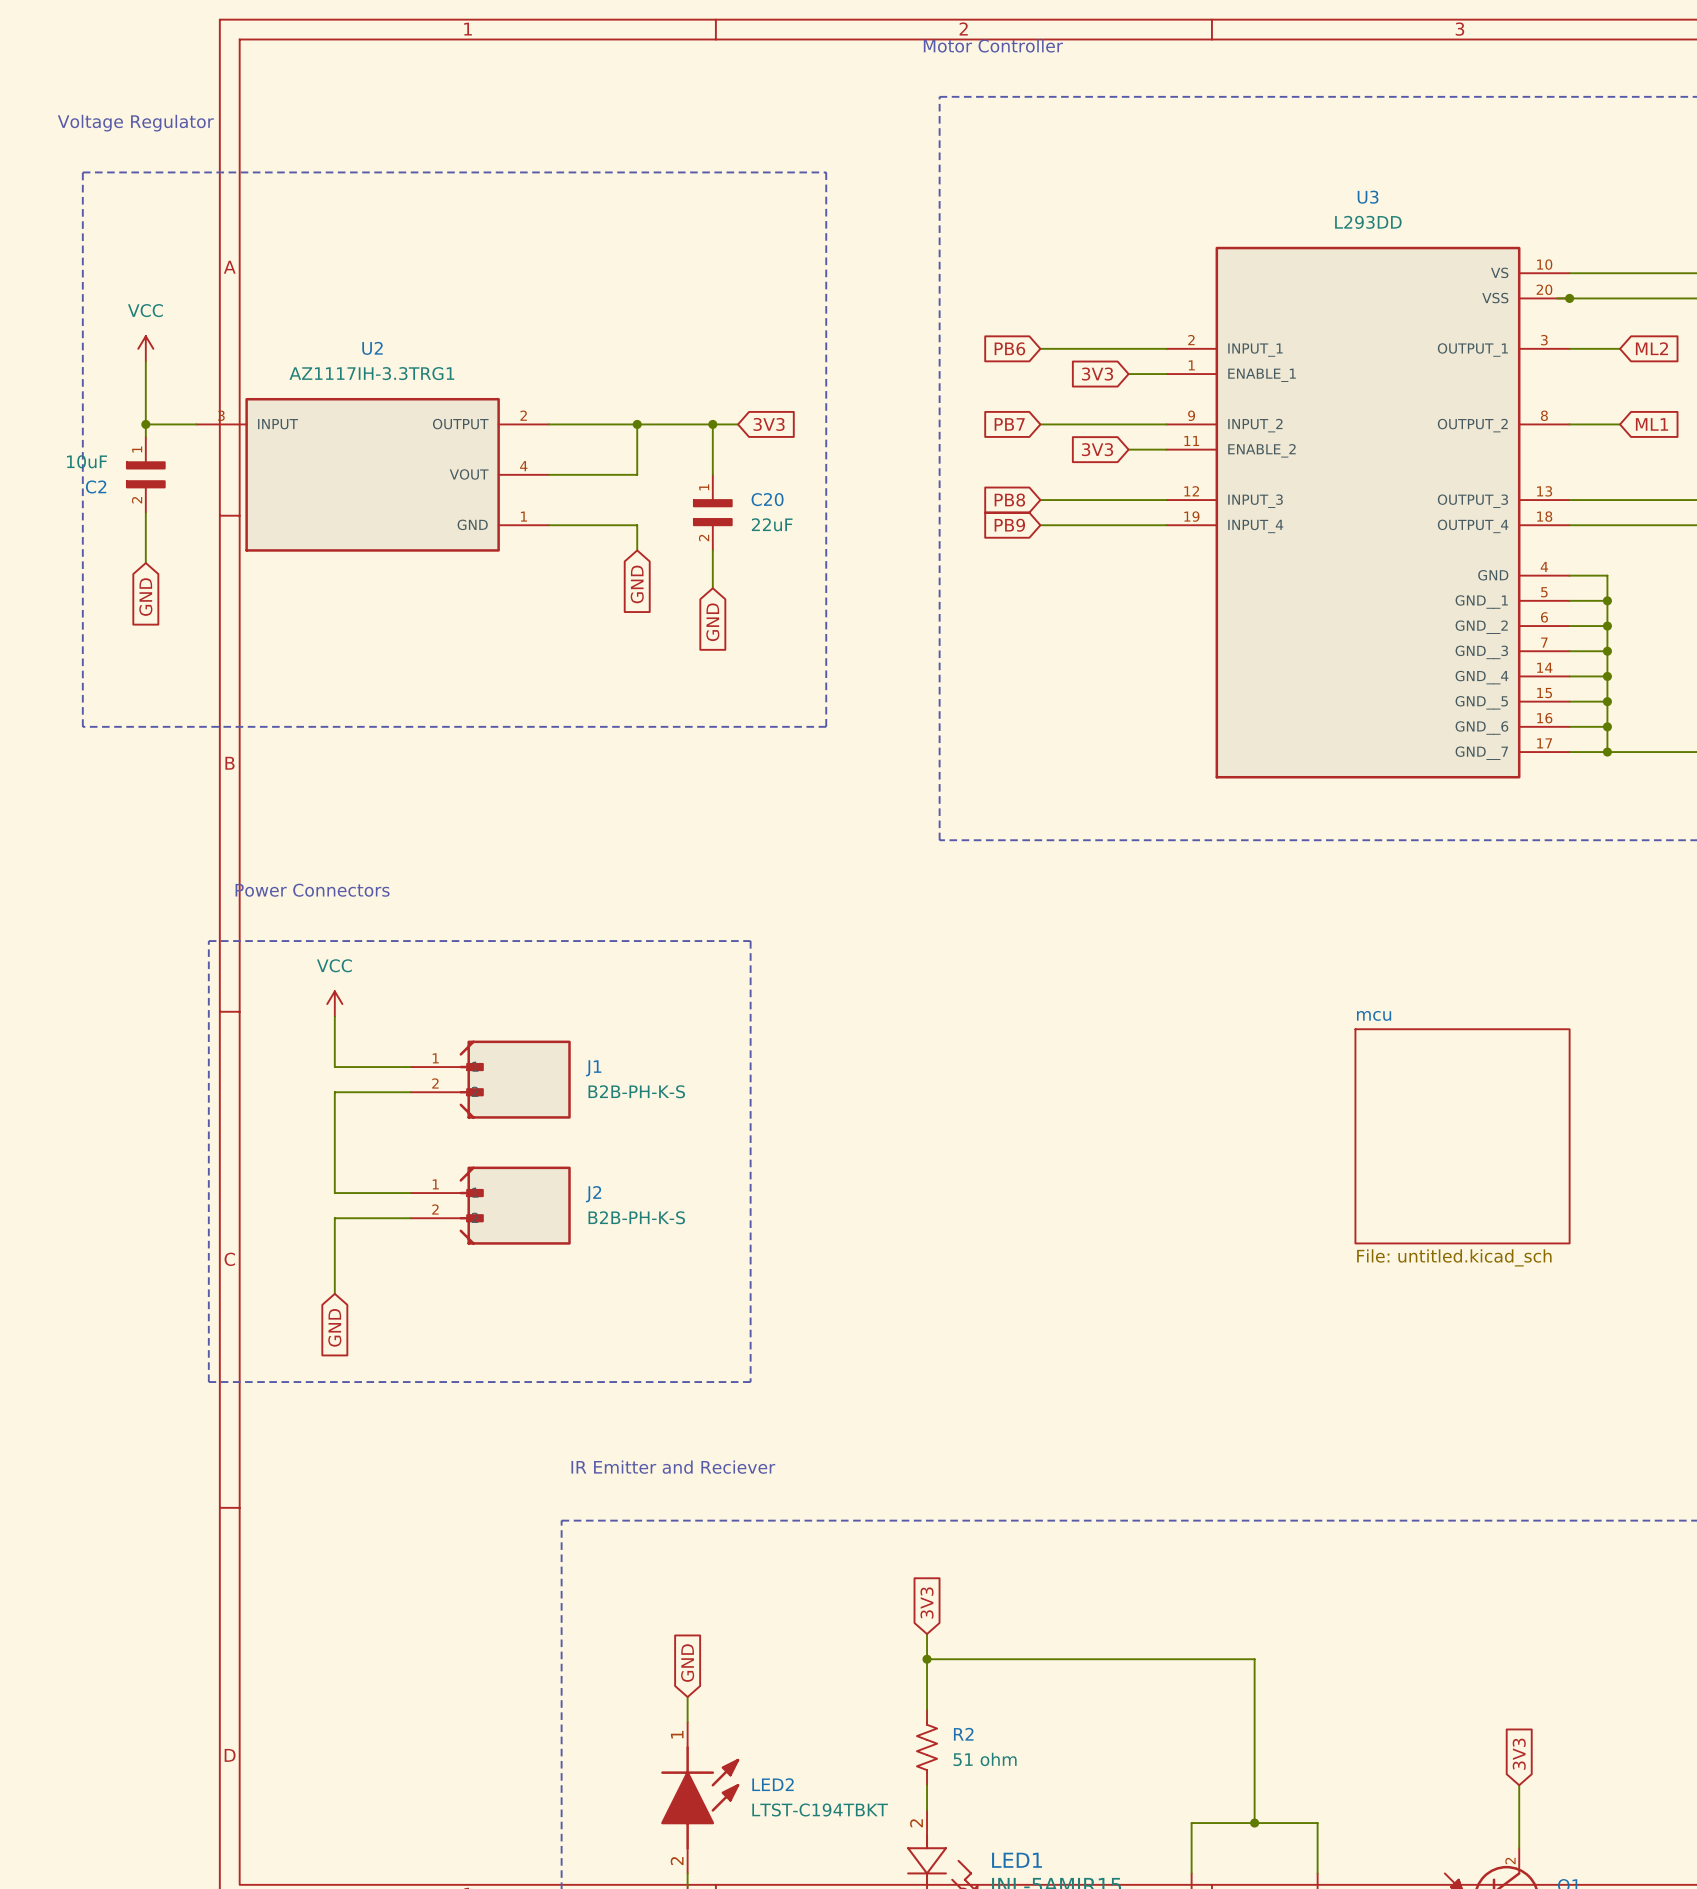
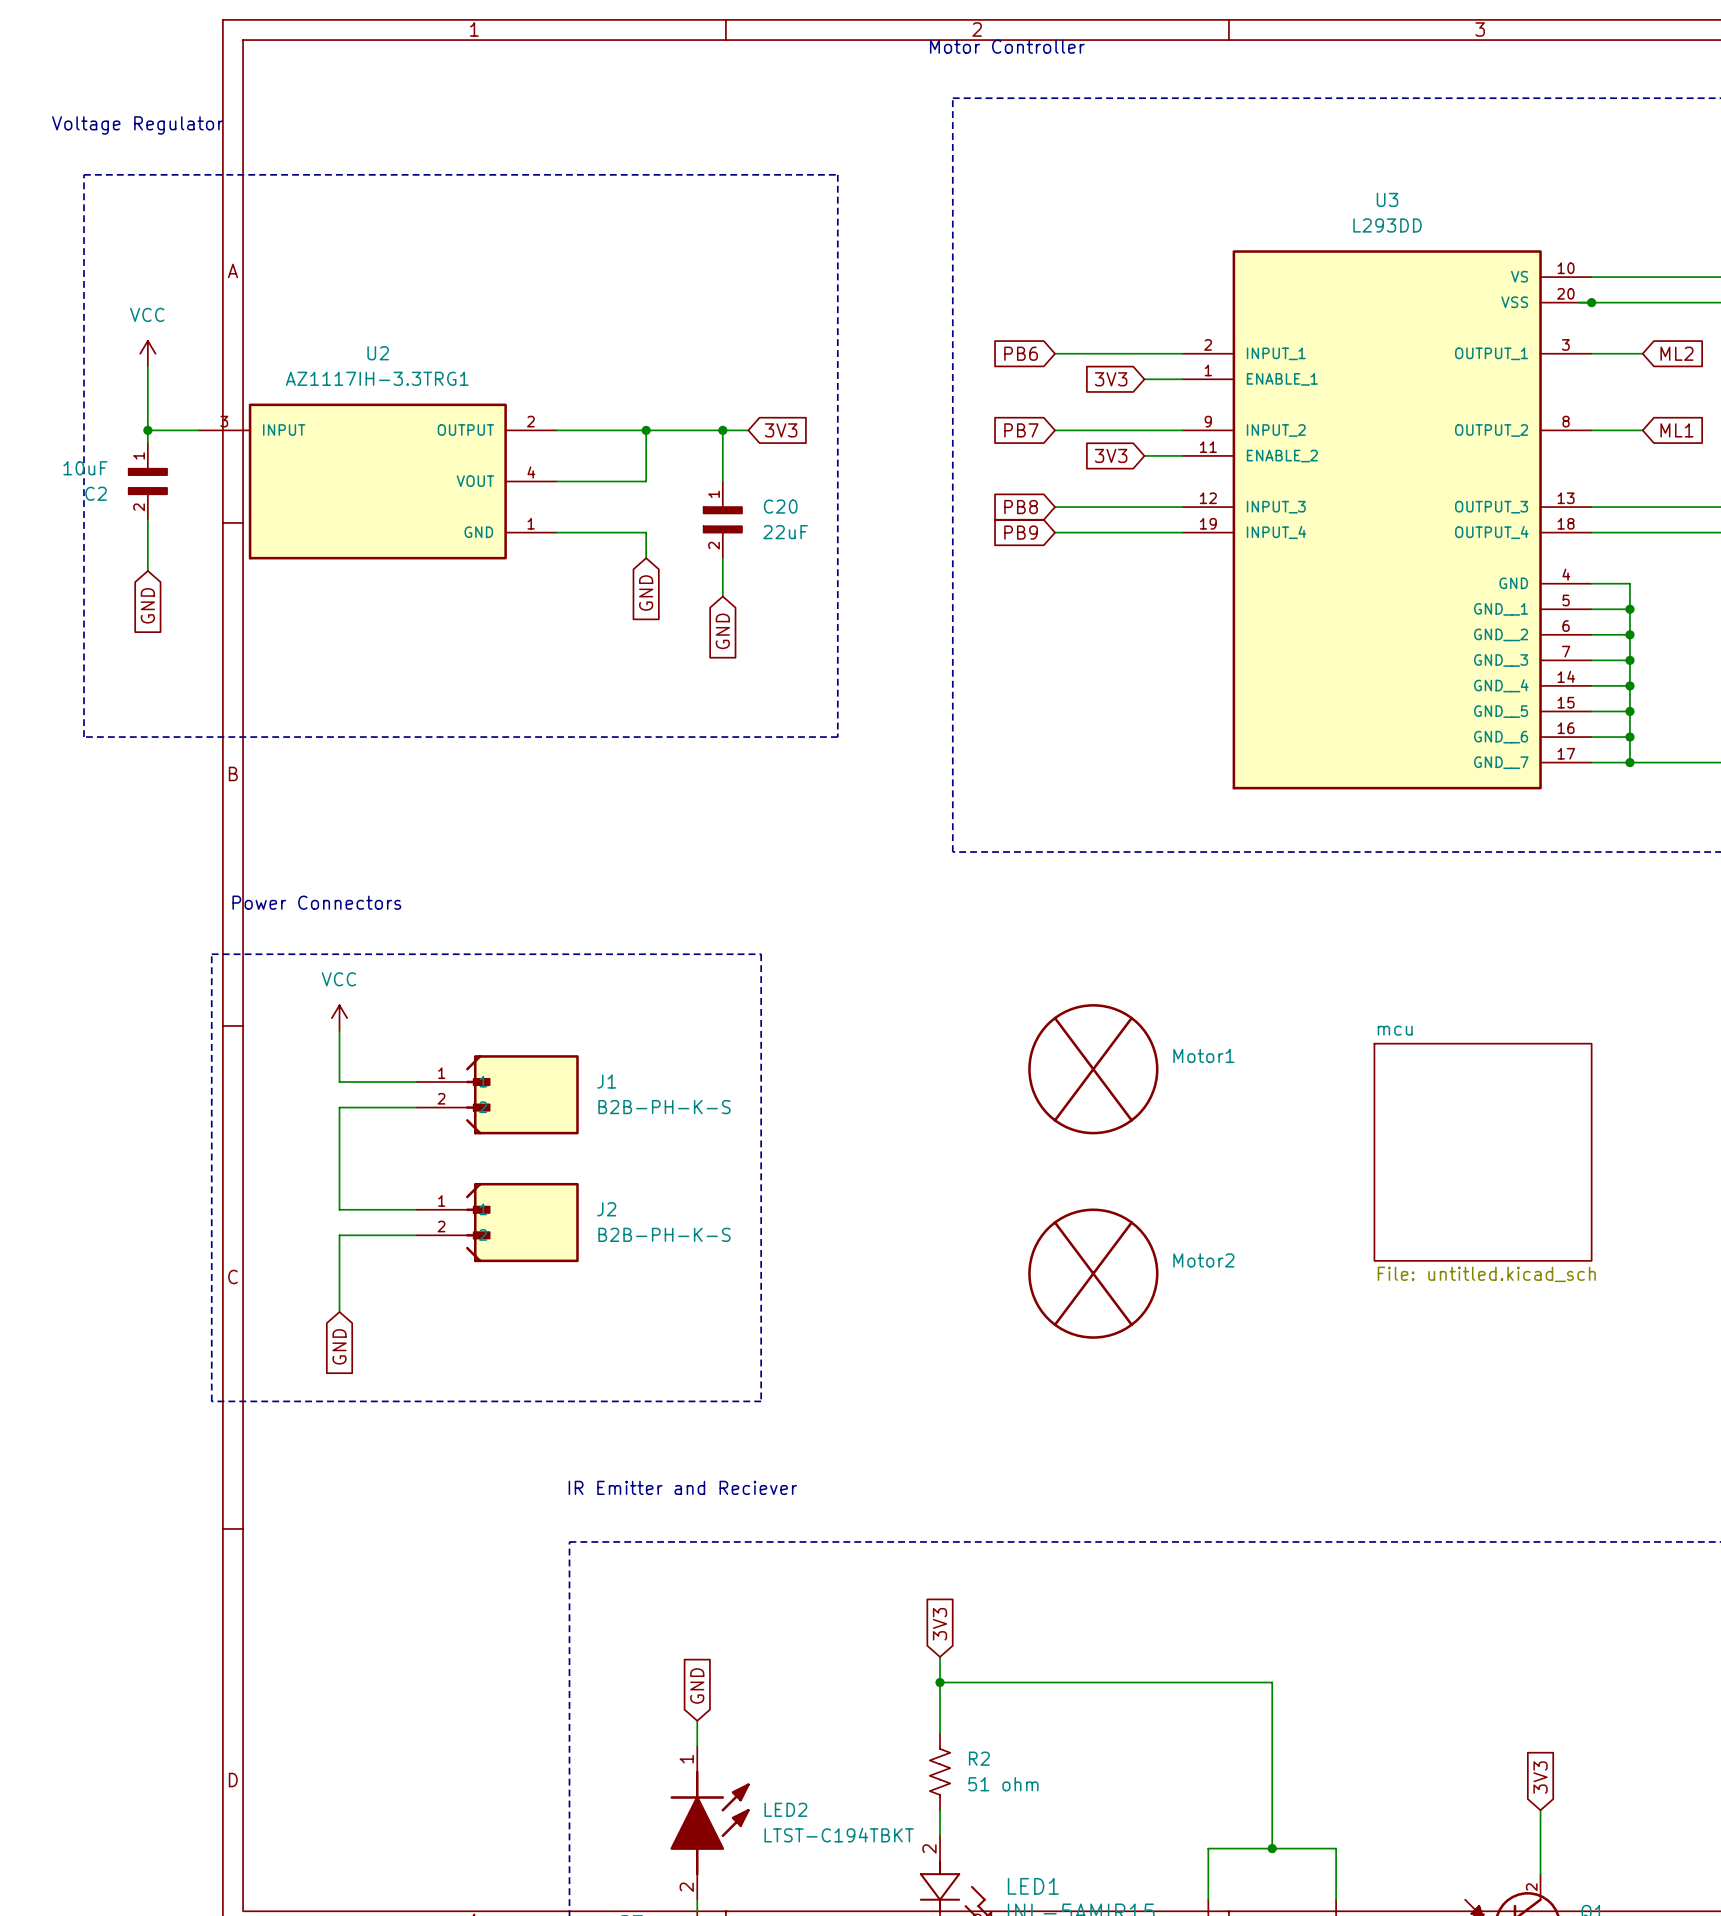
Motor1: none -> (1093, 1069)
Motor2: none -> (1093, 1273)

